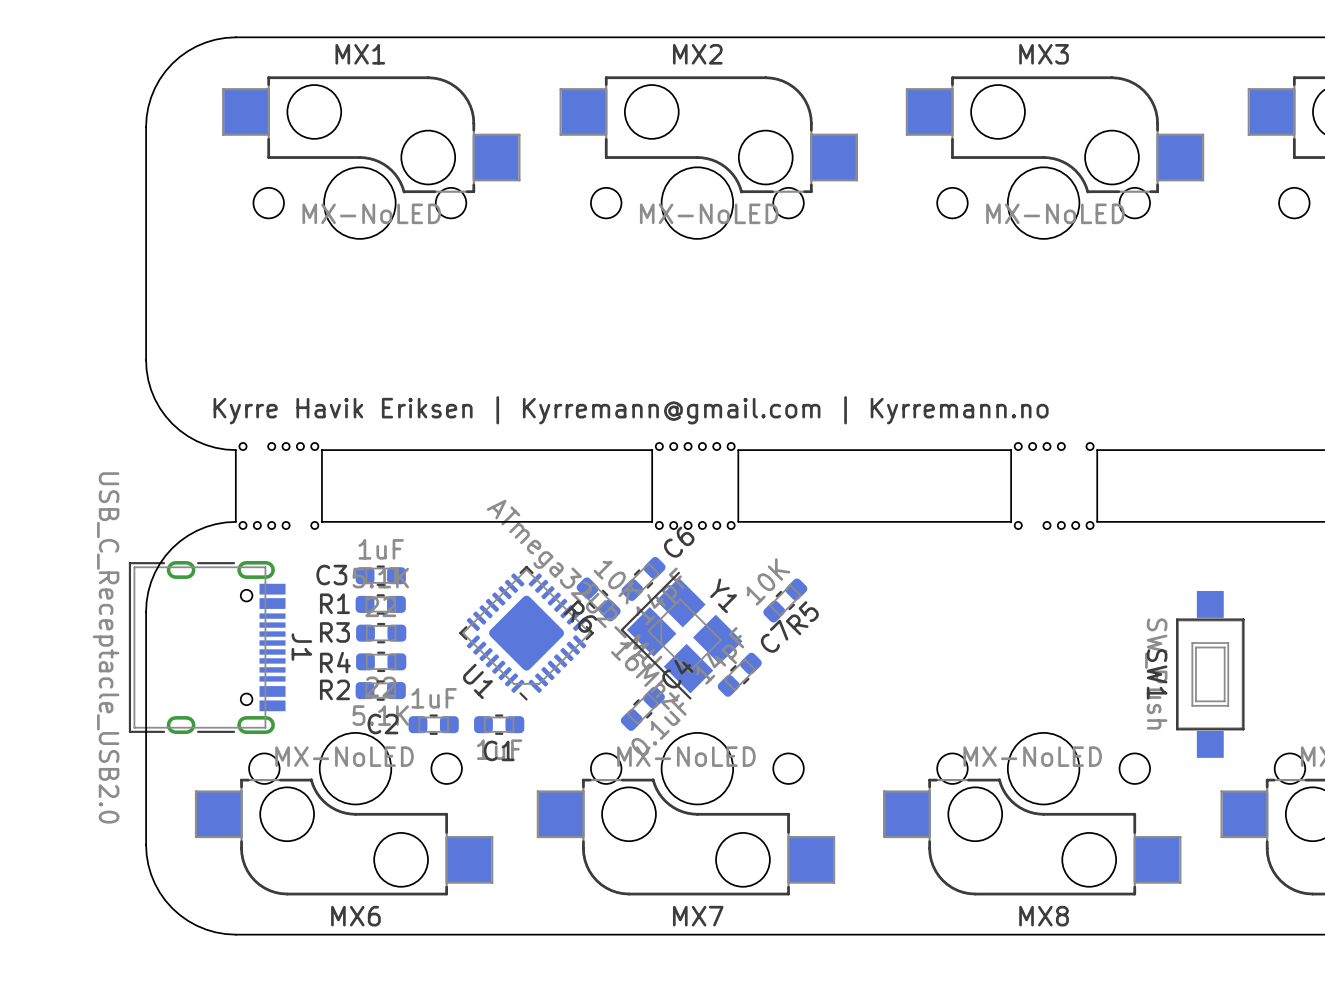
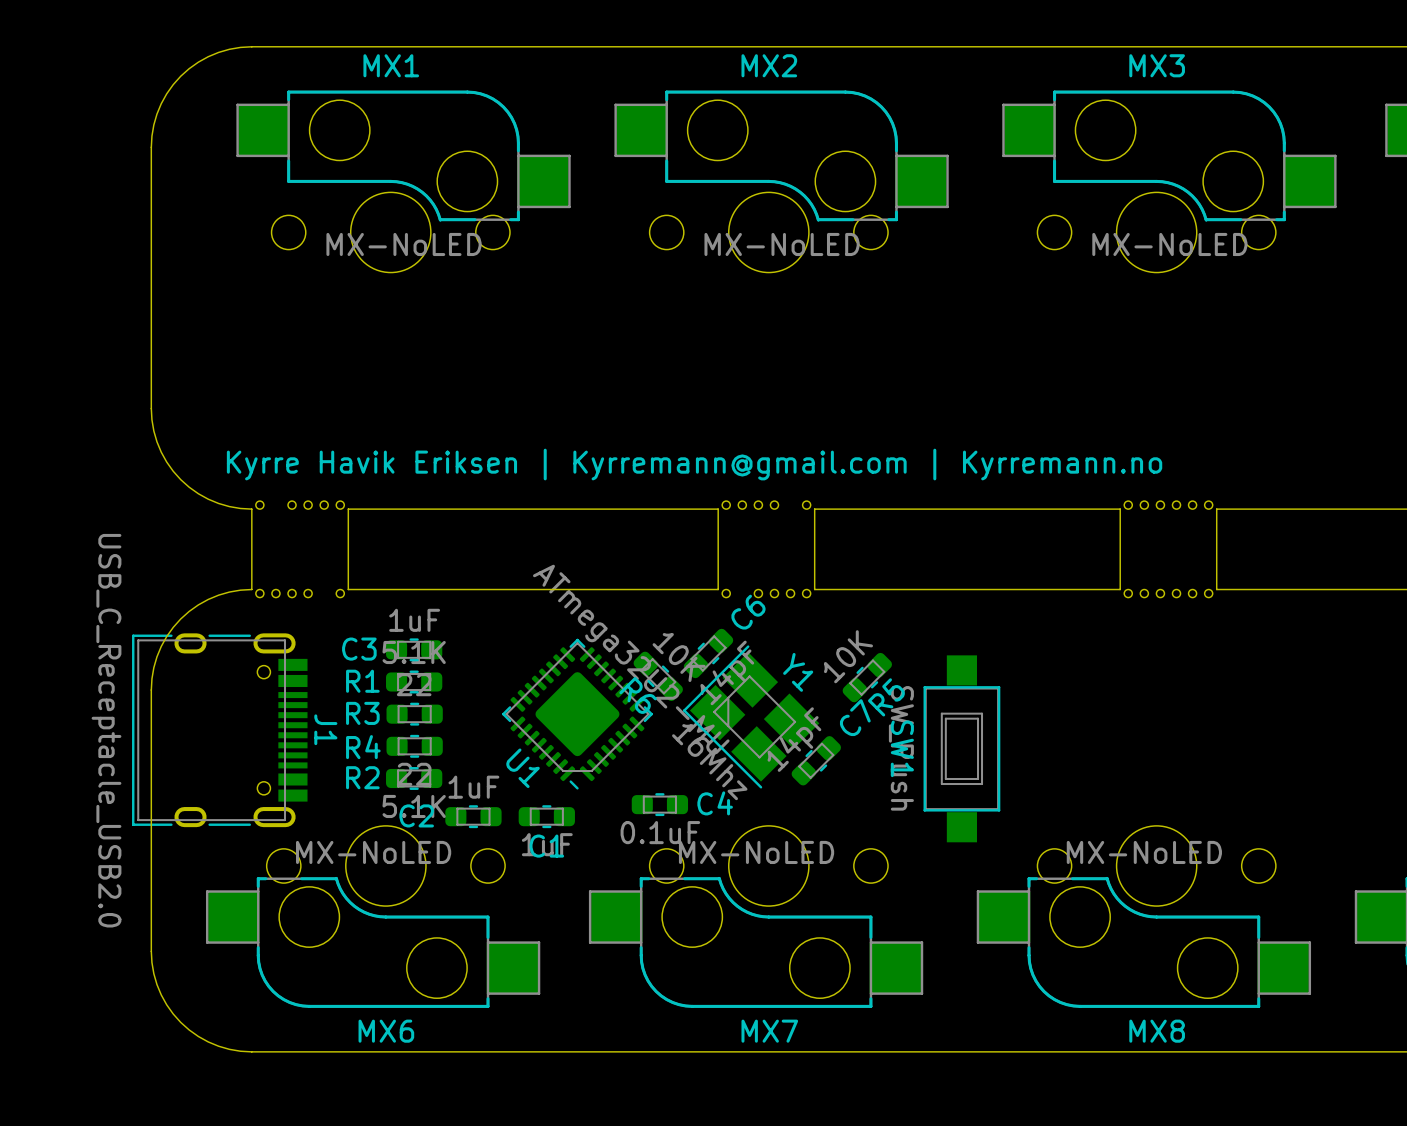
round board edge: [712, 442, 721, 451] -> none
round board edge: none -> [1188, 500, 1198, 510]
round board edge: [669, 521, 678, 530] -> none
round board edge: none -> [1139, 589, 1149, 599]
SW1 position: (1210, 674) -> (961, 748)
C4 rotation: 0° (642, 708) -> 45° clockwise (659, 804)
C4 position: (642, 708) -> (659, 804)

